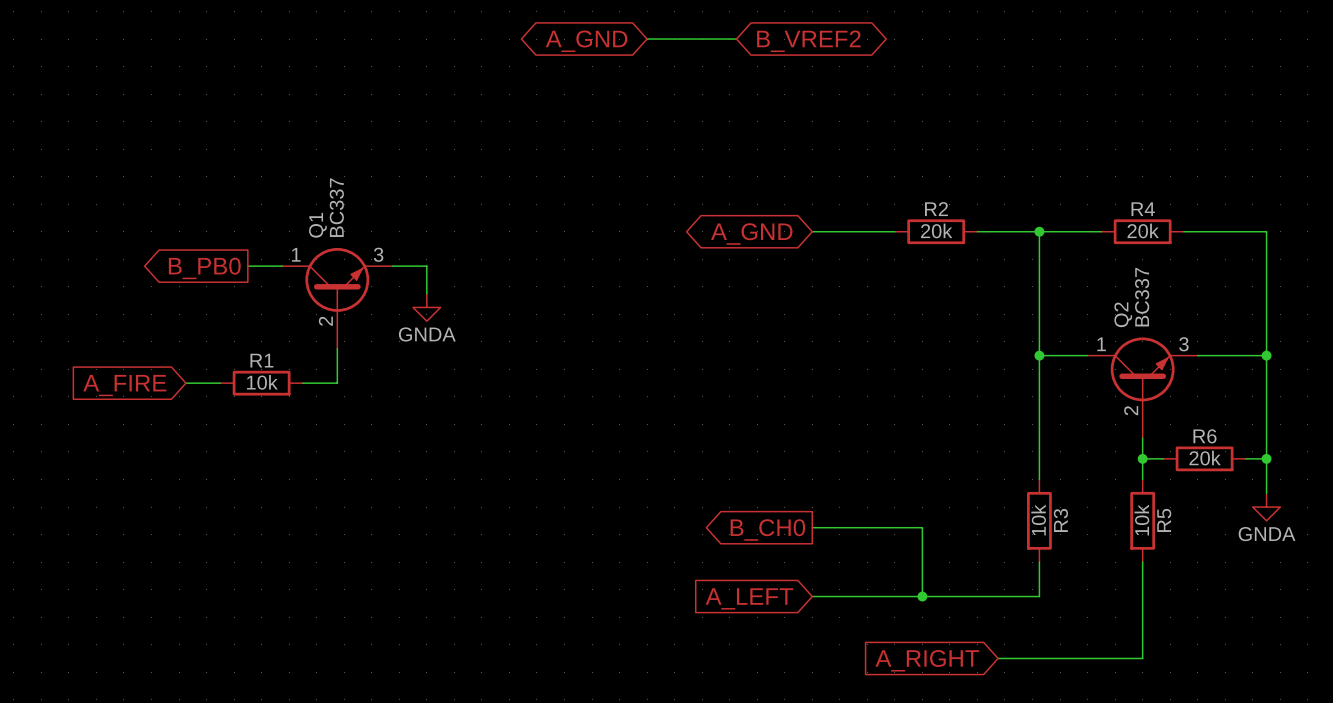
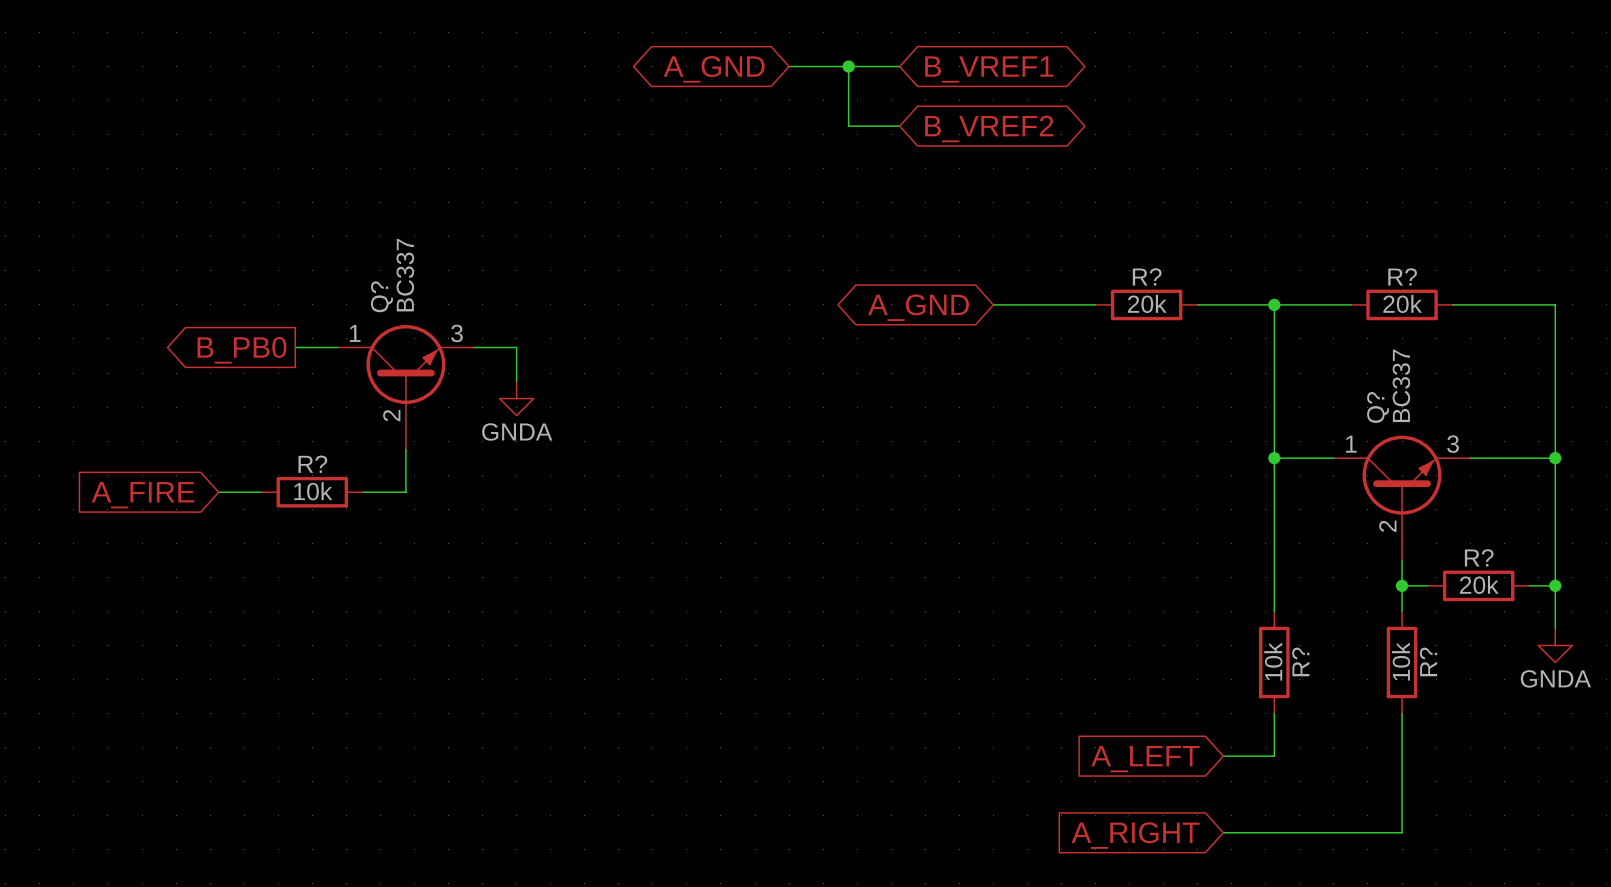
wire: none -> (848, 66) (848, 126) (899, 126)
junction: none -> (848, 66)
global label: B_VREF2 (808, 41) -> B_VREF1 (989, 69)
global label: none -> B_VREF2 (989, 128)
R2 name: R2 (936, 209) -> R? (1147, 276)
R4 name: R4 (1143, 209) -> R? (1402, 276)
Q1 name: Q1 (317, 225) -> Q? (381, 296)
Q2 name: Q2 (1123, 314) -> Q? (1378, 407)
R1 name: R1 (261, 360) -> R? (312, 464)
R6 name: R6 (1204, 436) -> R? (1479, 557)
R3 name: R3 (1060, 520) -> R? (1300, 661)
R5 name: R5 (1164, 520) -> R? (1428, 661)
wire: (812, 527) (922, 527) (922, 596) -> none
global label: B_CH0 (767, 529) -> none
wire: (812, 596) (998, 596) -> none
junction: (922, 596) -> none
global label position: A_LEFT (749, 598) -> A_LEFT (1145, 759)

